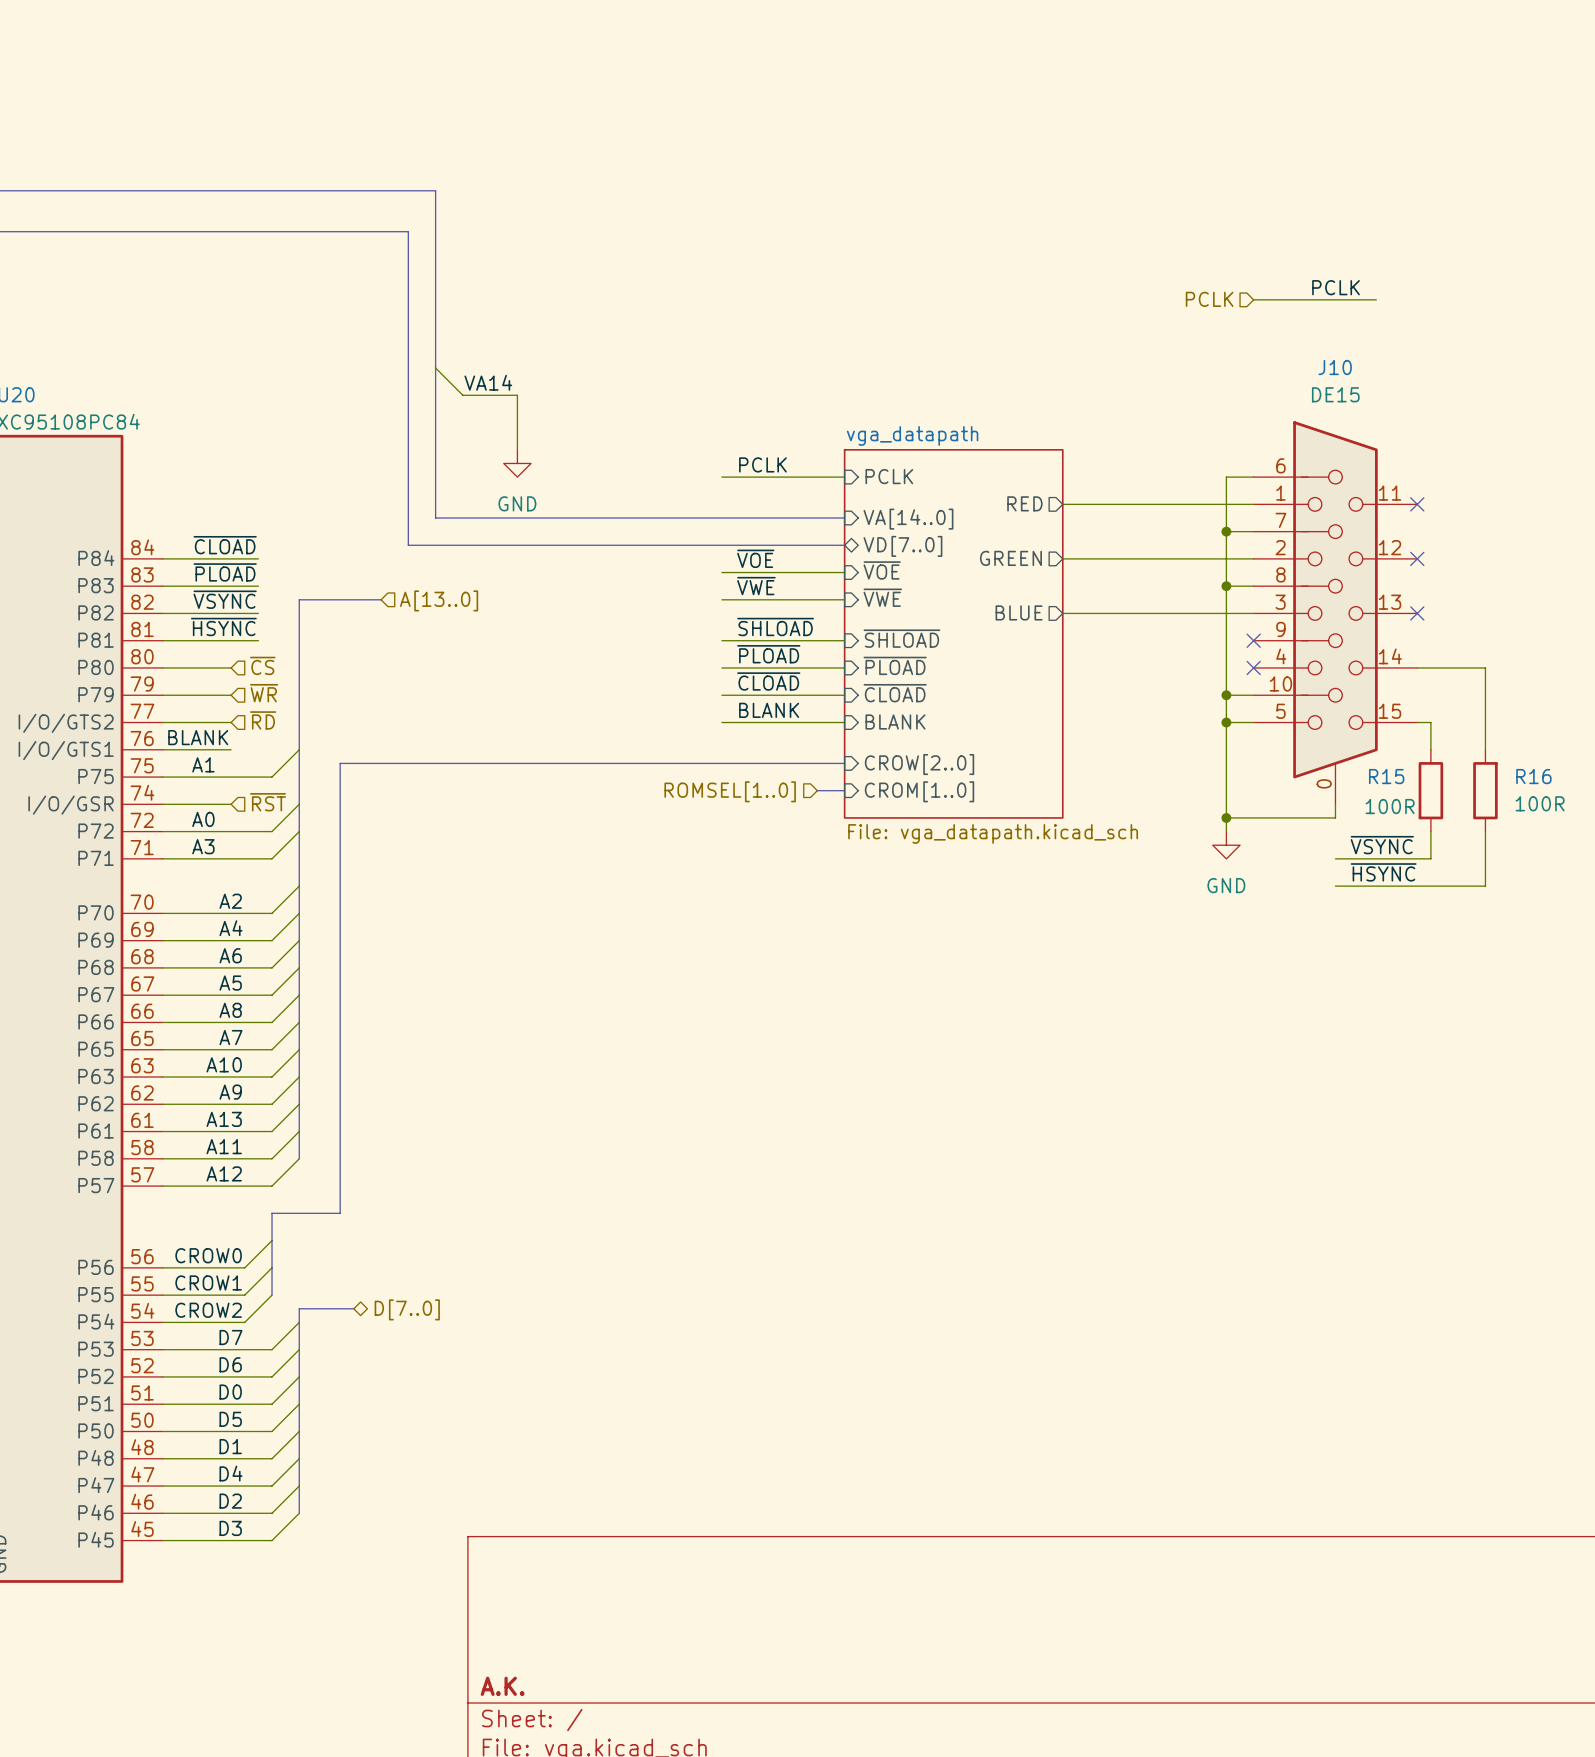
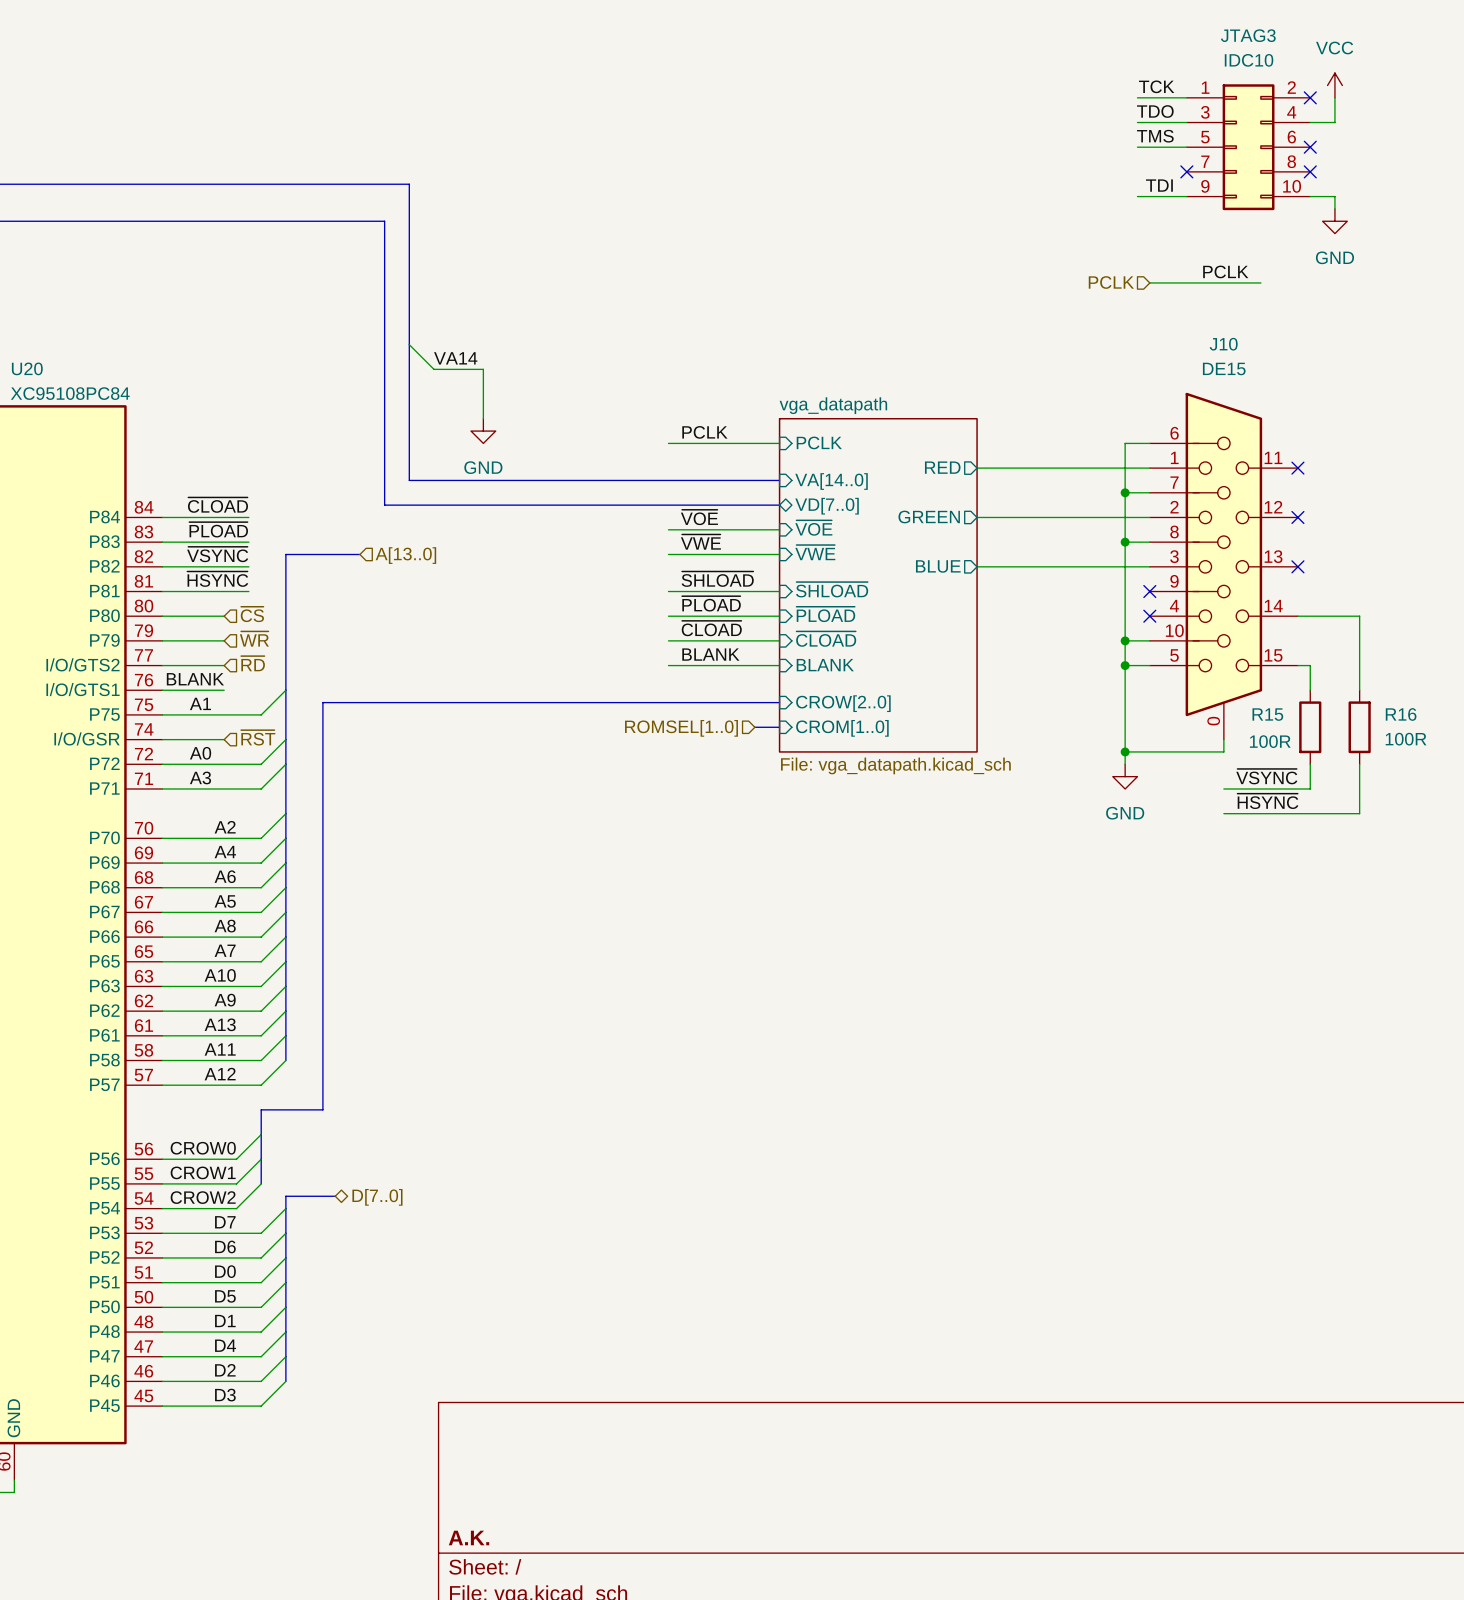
power symbol: none -> VCC (1334, 85)
label: none -> TCK (1156, 86)
wire: none -> (1137, 97) (1186, 97)
no-connect mark: none -> (1310, 97)
wire: none -> (1334, 97) (1334, 122) (1310, 122)
label: none -> TDO (1155, 111)
wire: none -> (1137, 122) (1186, 122)
label: none -> TMS (1155, 136)
wire: none -> (1137, 147) (1186, 147)
JTAG3: none -> IDC10 (1248, 147)
no-connect mark: none -> (1310, 147)
no-connect mark: none -> (1186, 171)
no-connect mark: none -> (1310, 171)
label: none -> TDI (1159, 185)
wire: none -> (1137, 196) (1186, 196)
wire: none -> (1310, 196) (1334, 196) (1334, 208)
power symbol: none -> GND (1334, 221)

